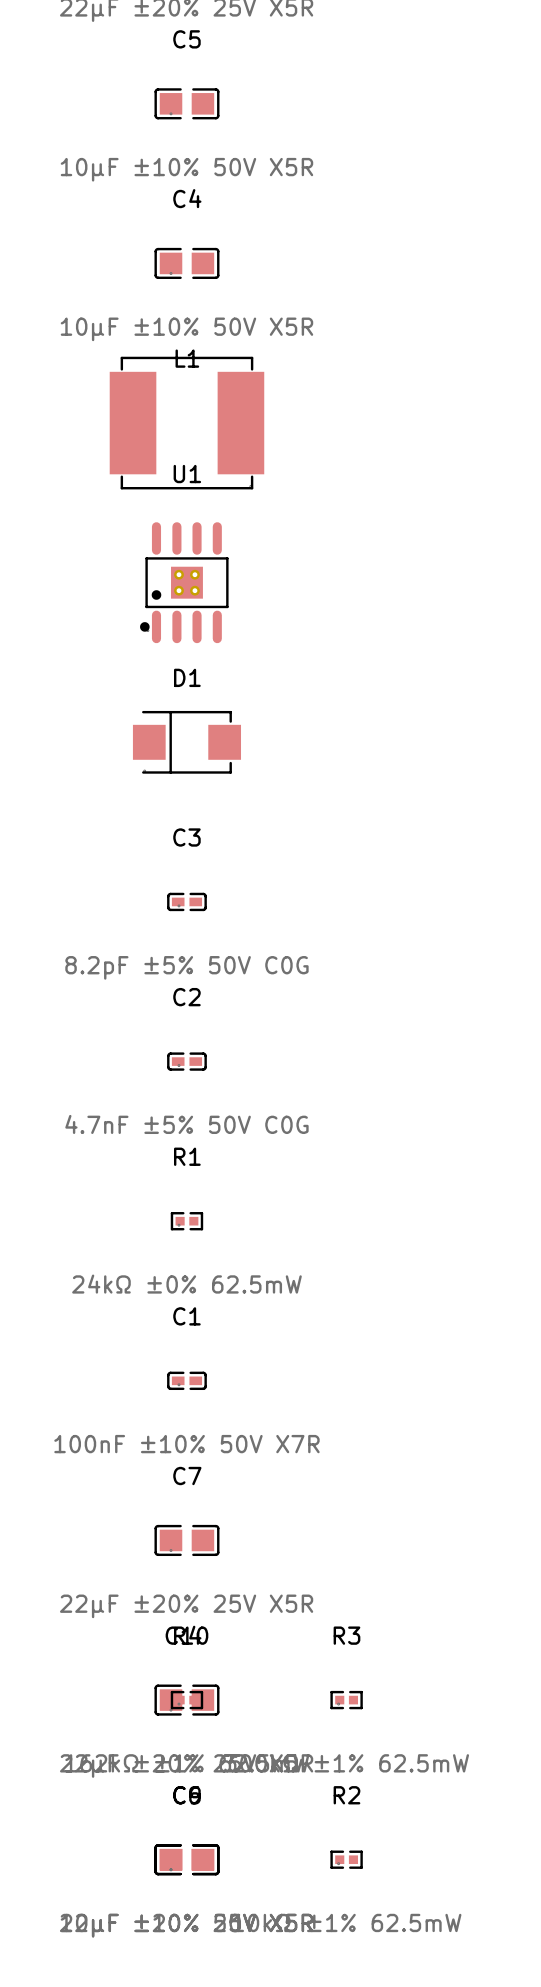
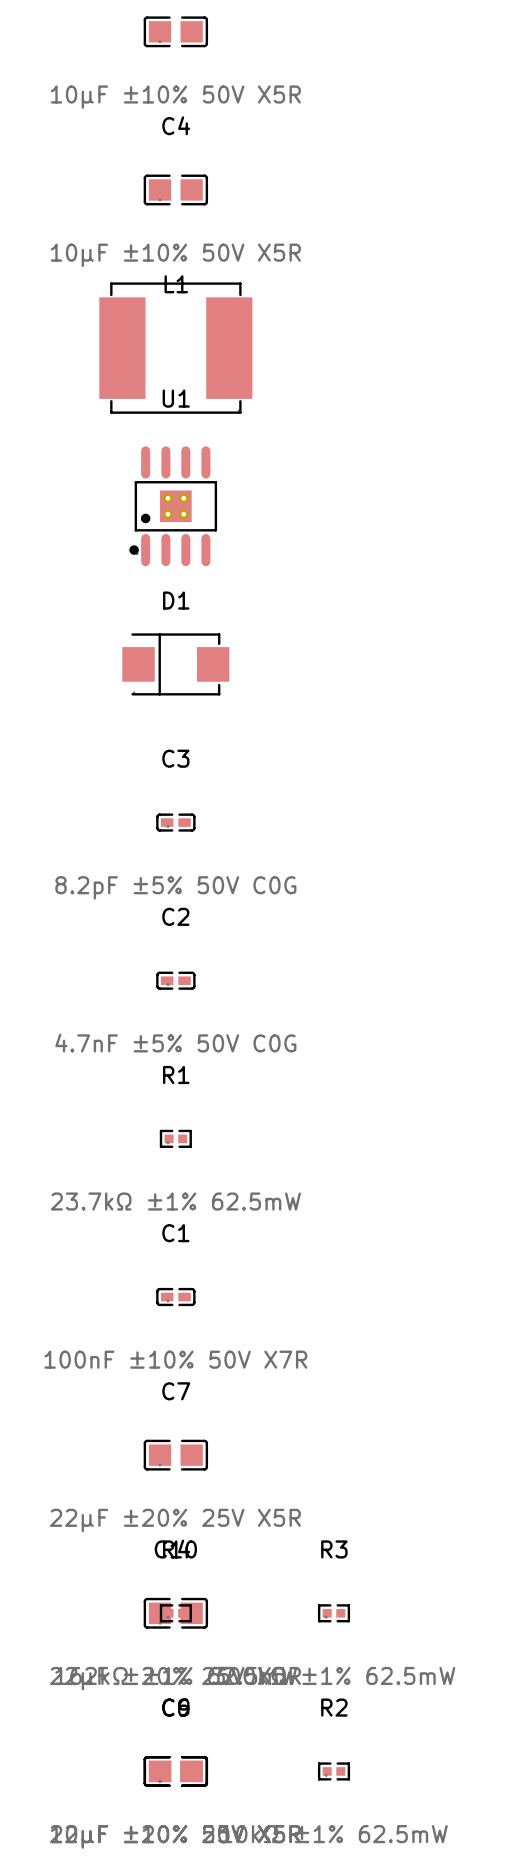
R1 value: 24kΩ ±0% 62.5mW (186, 1284) -> 23.7kΩ ±1% 62.5mW (175, 1201)

